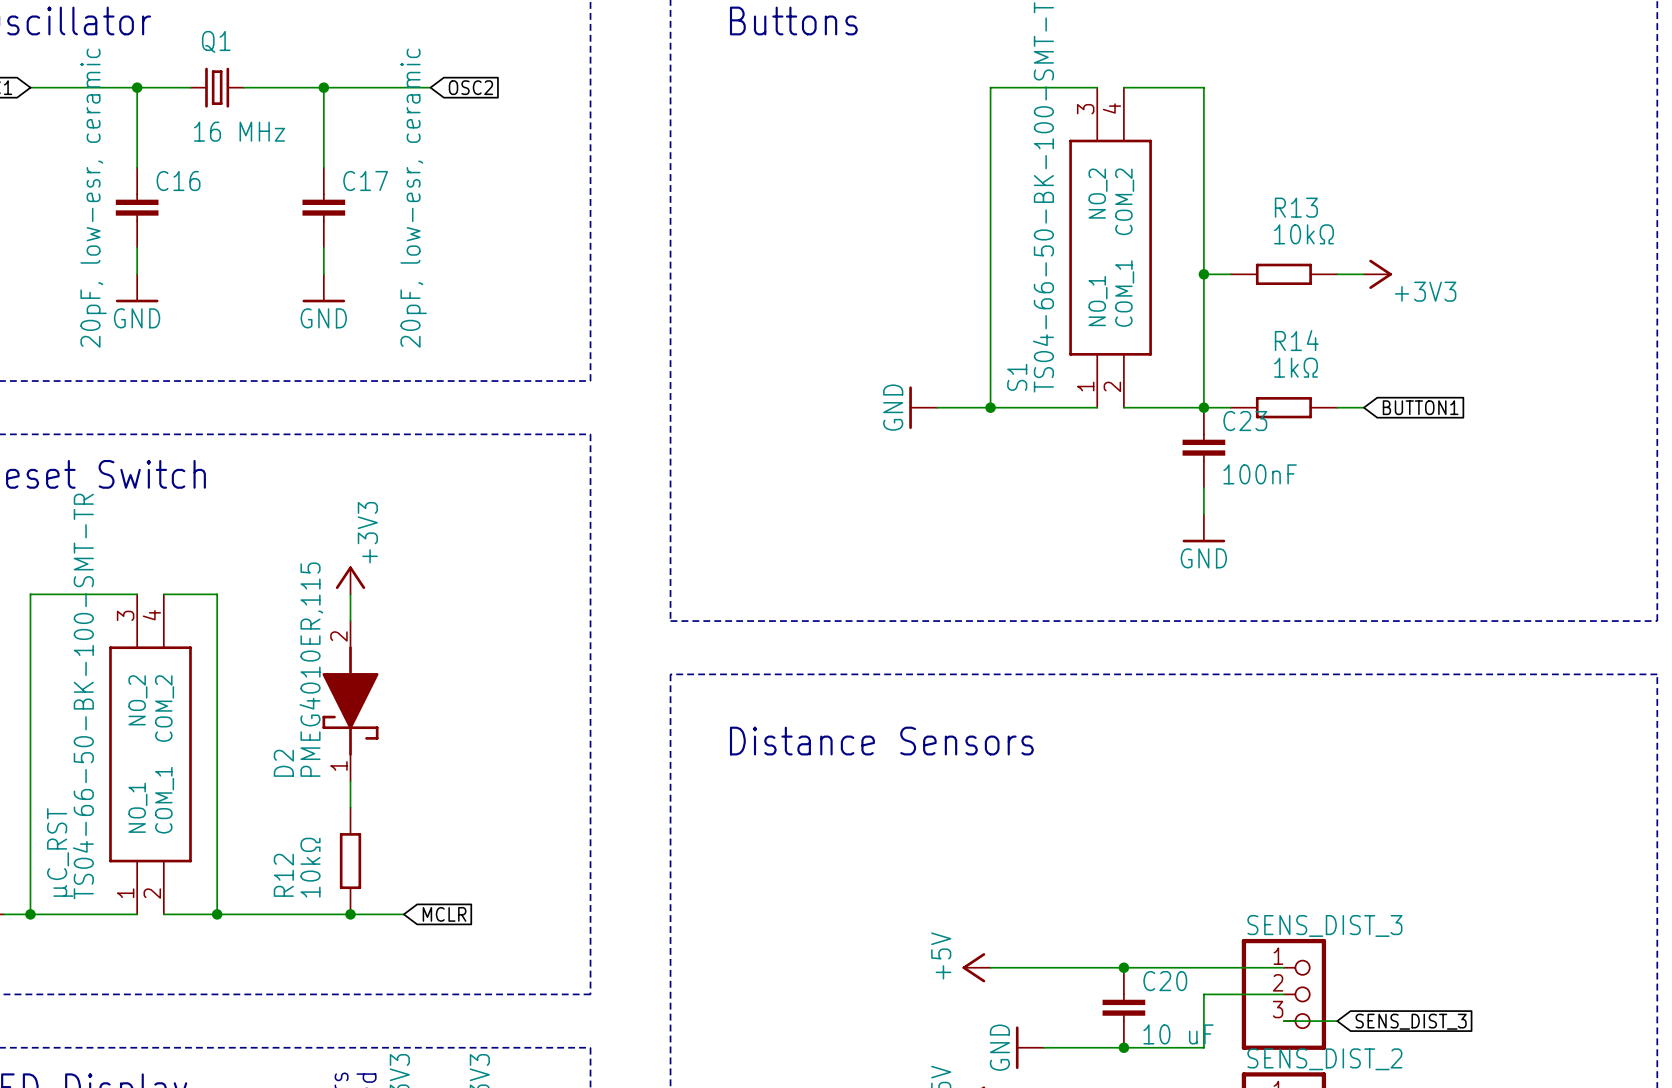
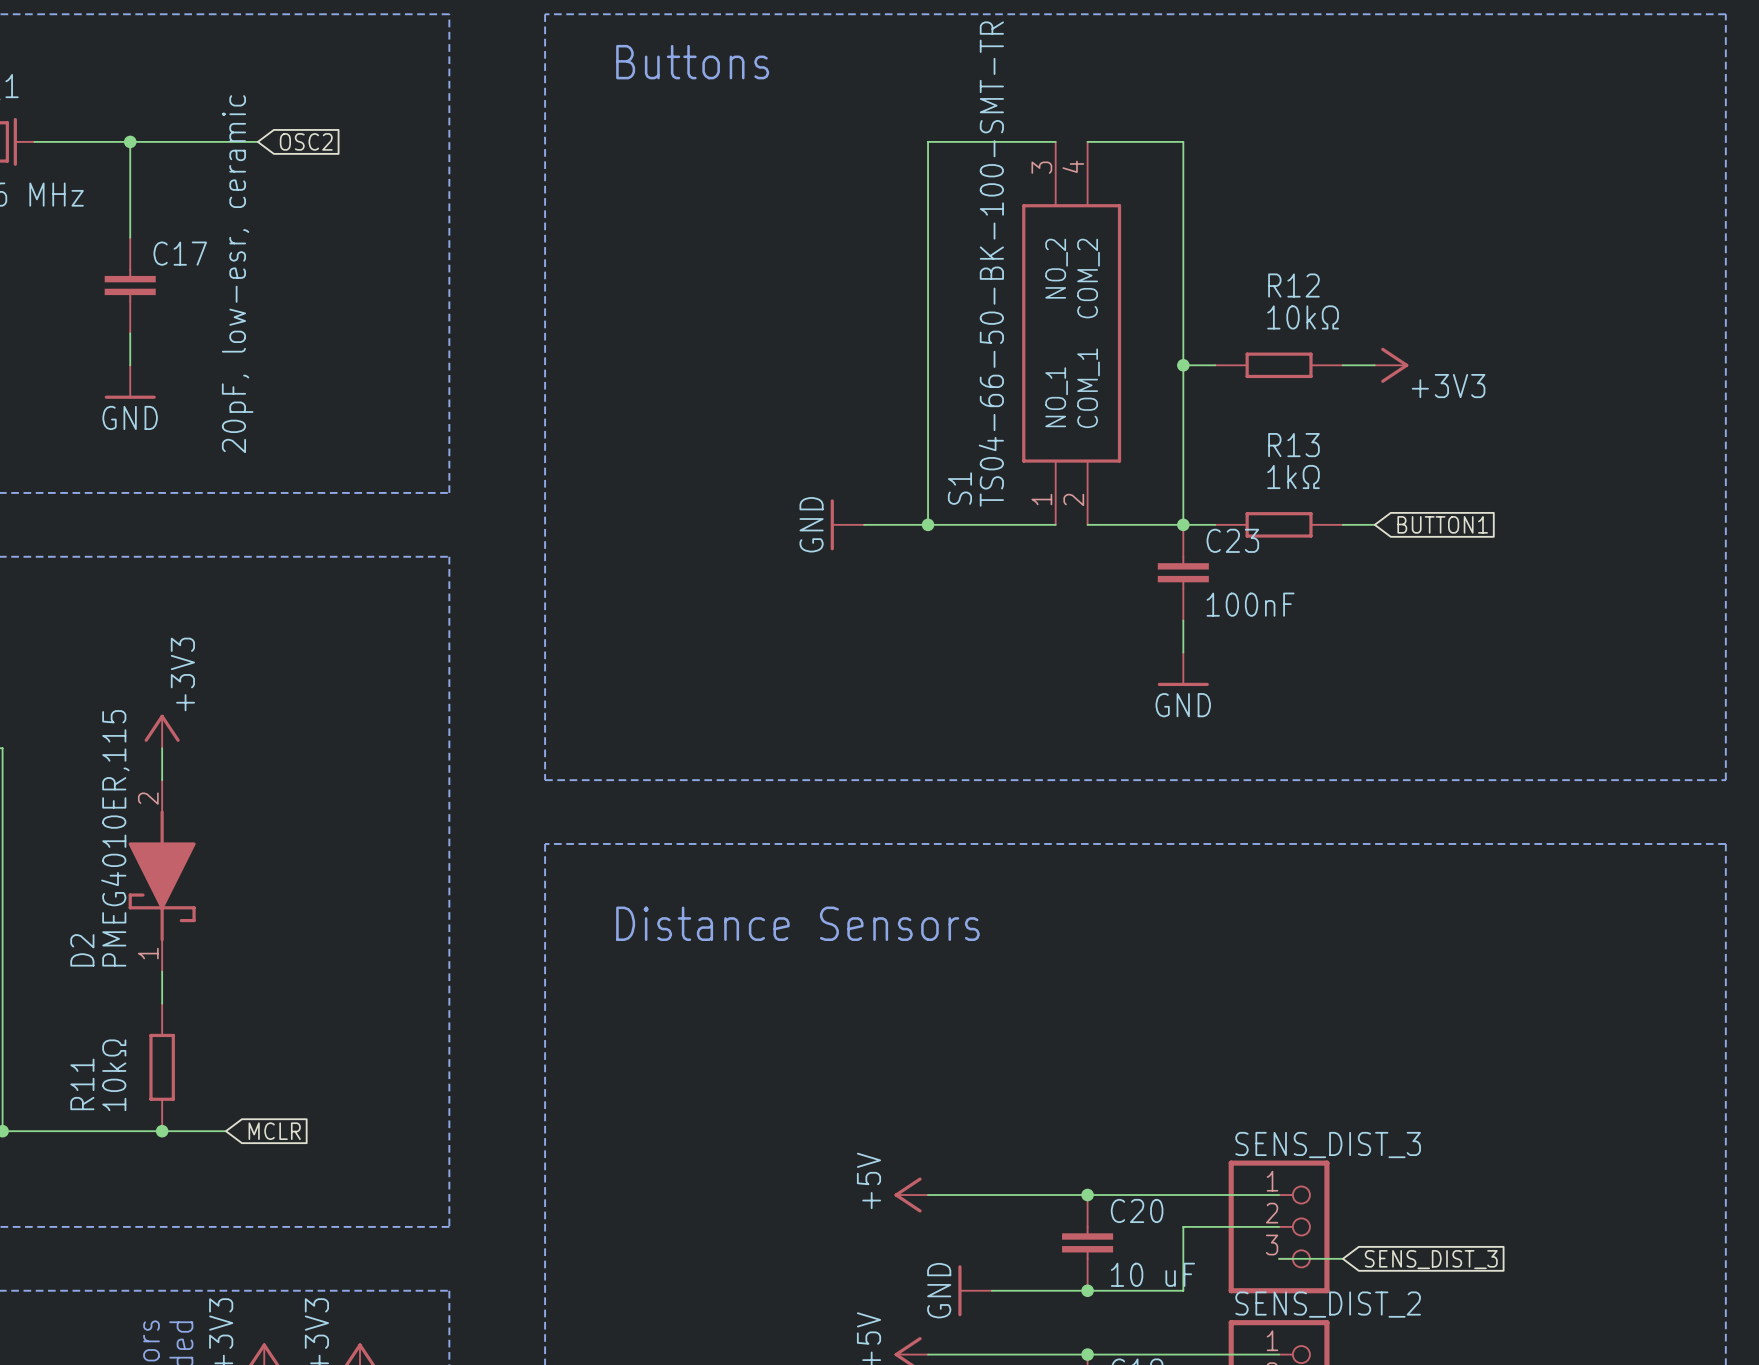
R13 name: R13 (1296, 207) -> R12 (1293, 285)
R14 name: R14 (1296, 340) -> R13 (1293, 445)
R12 name: R12 (283, 875) -> R11 (82, 1084)

